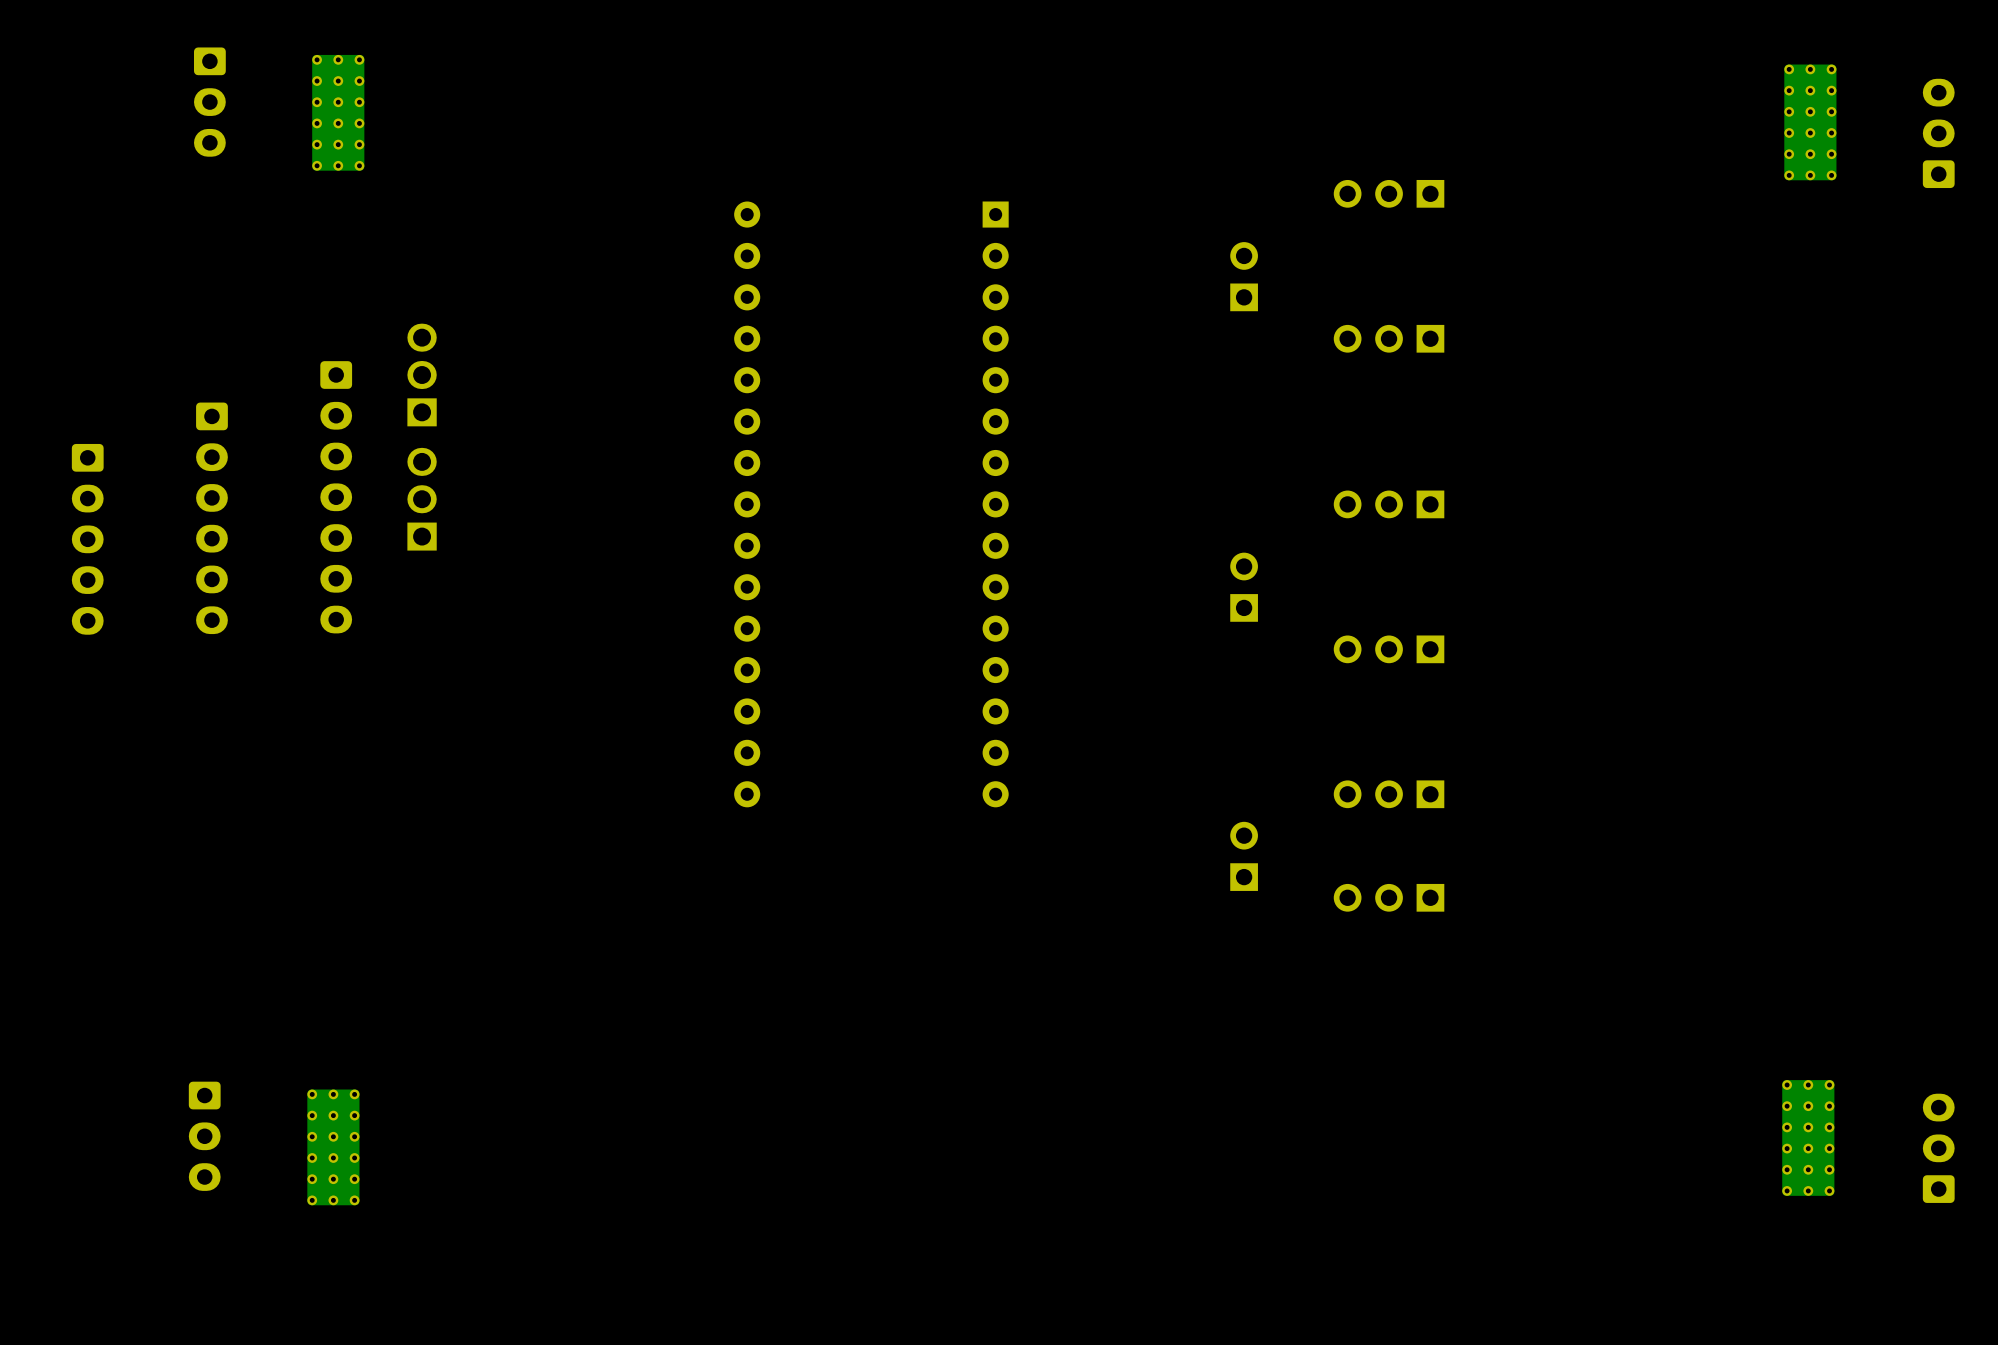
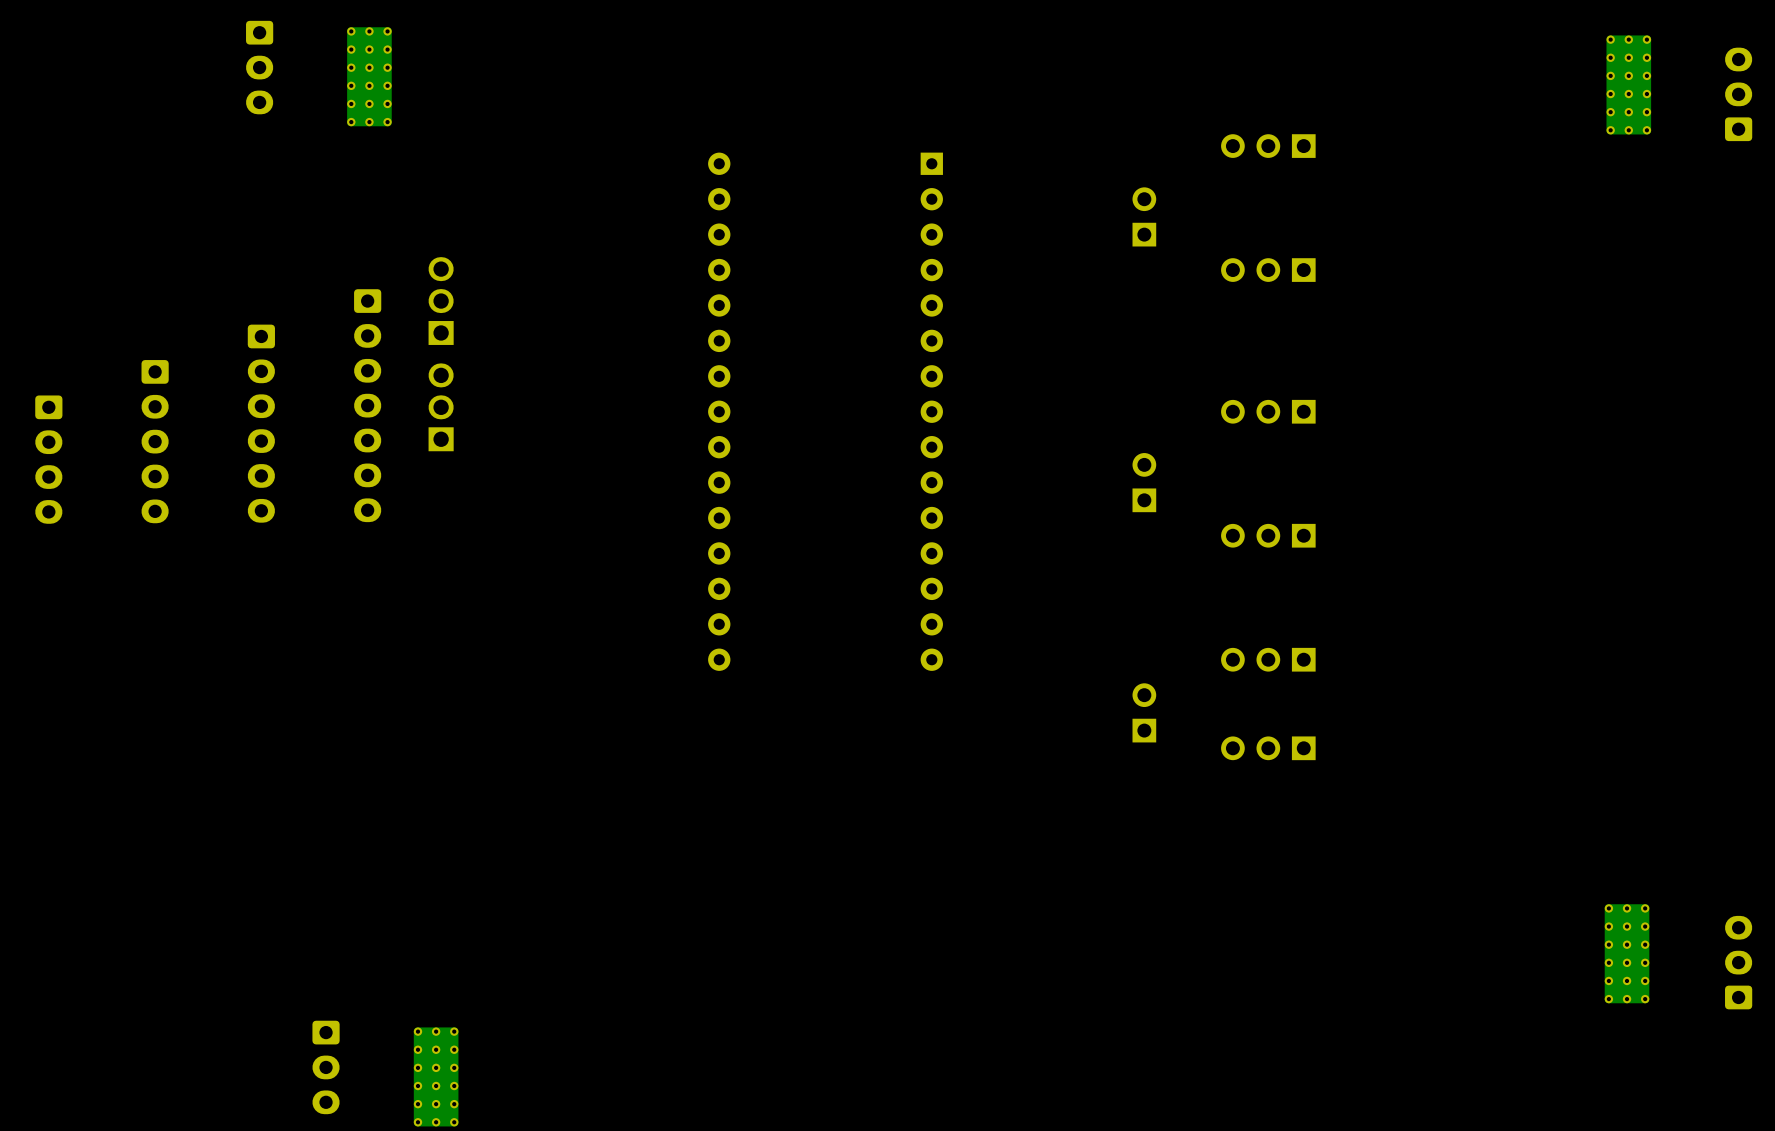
part position: (204, 1136) -> (326, 1067)
part position: (333, 1147) -> (436, 1076)

